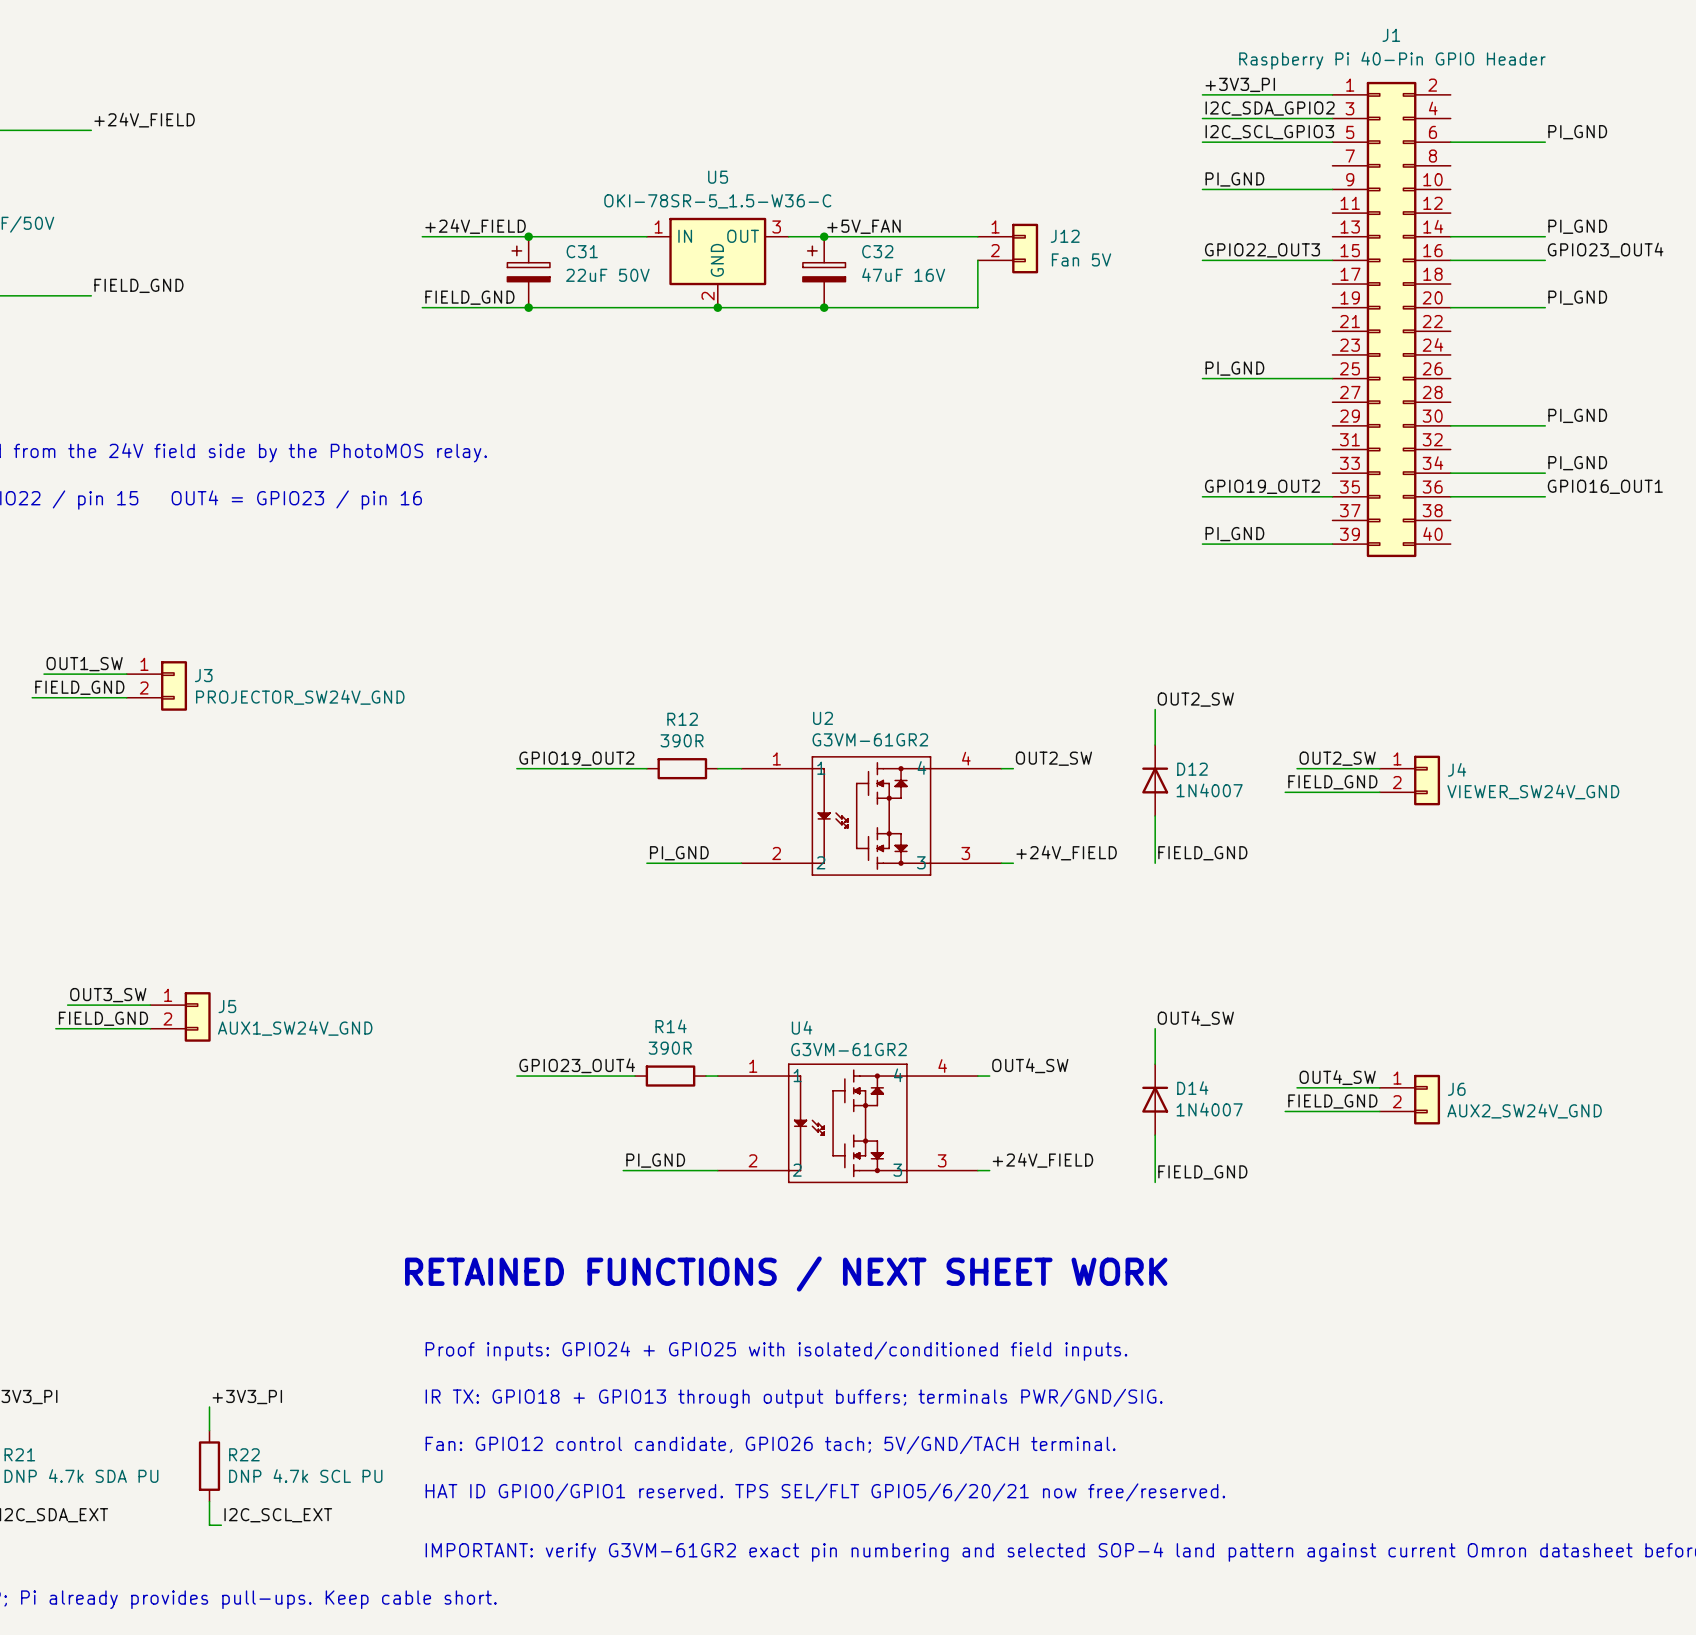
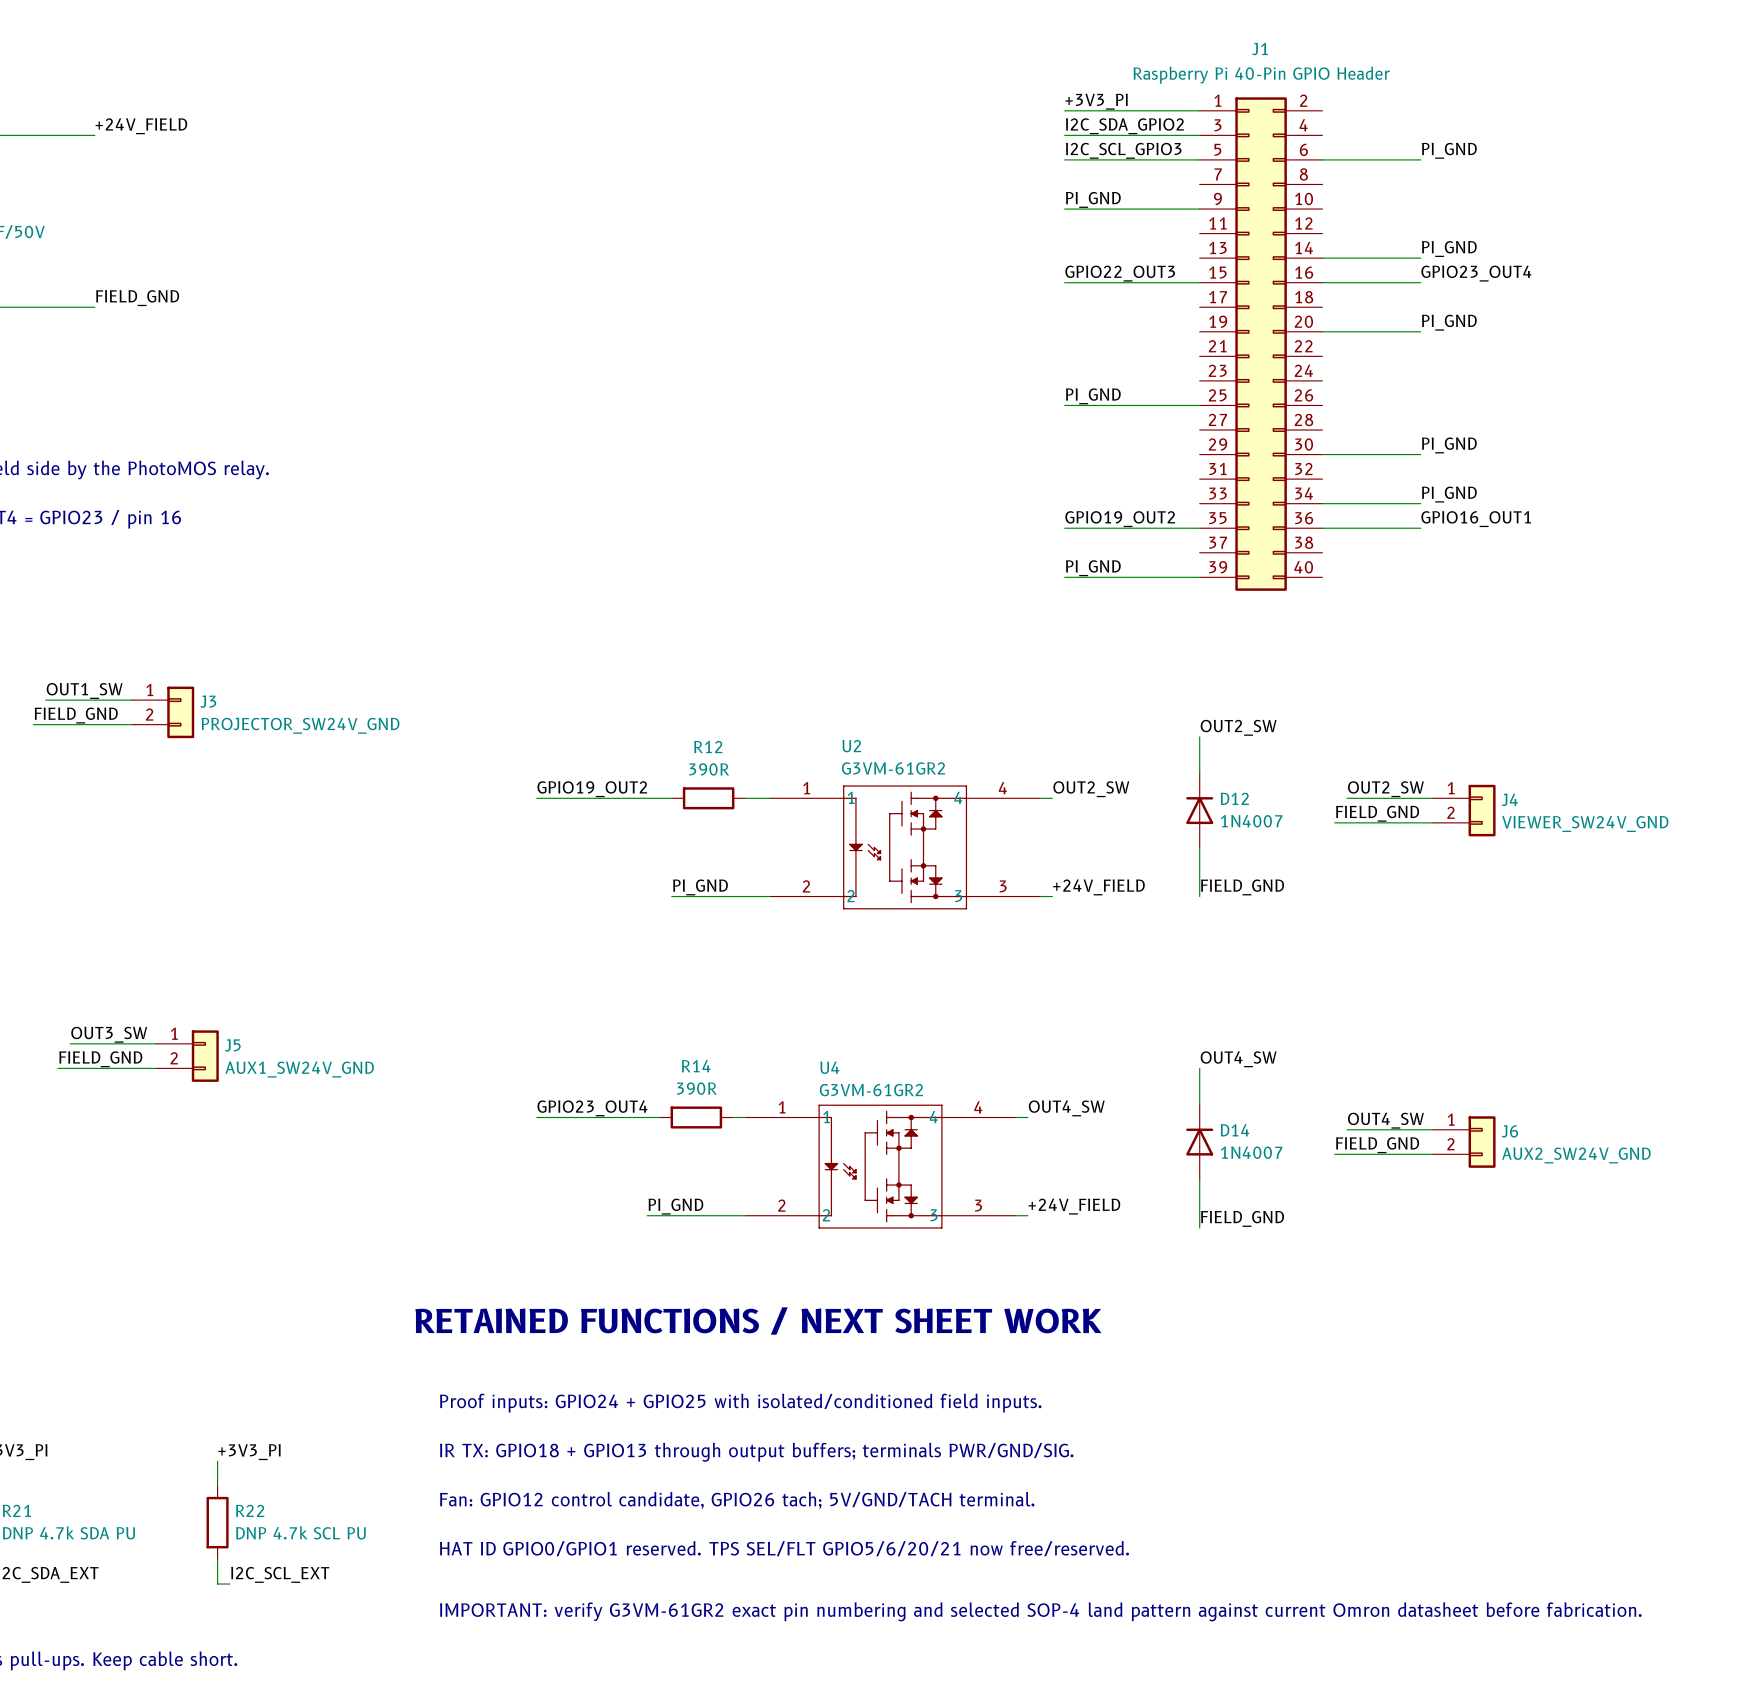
label position: +3V3_PI (1240, 84) -> +3V3_PI (1096, 101)
wire: (1202, 94) (1332, 94) -> (1064, 110) (1199, 110)
label position: I2C_SDA_GPIO2 (1270, 108) -> I2C_SDA_GPIO2 (1124, 126)
wire: (1202, 118) (1332, 118) -> (1064, 135) (1199, 135)
label position: I2C_SCL_GPIO3 (1269, 132) -> I2C_SCL_GPIO3 (1123, 150)
label: PI_GND (1577, 132) -> none
wire: (1202, 142) (1332, 142) -> (1064, 159) (1199, 159)
wire: (1450, 142) (1545, 142) -> (1322, 159) (1420, 159)
label: none -> PI_GND (1449, 150)
label: PI_GND (1234, 179) -> none
wire: (1202, 189) (1332, 189) -> (1064, 209) (1199, 209)
label: none -> PI_GND (1093, 199)
label: +24V_FIELD (475, 226) -> none
label: +5V_FAN (863, 226) -> none
label: PI_GND (1577, 226) -> none
wire: (422, 236) (646, 236) -> none
junction: (528, 236) -> none
wire: (788, 236) (977, 236) -> none
junction: (824, 236) -> none
wire: (1450, 236) (1545, 236) -> (1322, 258) (1420, 258)
label: none -> PI_GND (1449, 249)
J12: Fan 5V (1008, 248) -> none
label position: GPIO22_OUT3 (1262, 250) -> GPIO22_OUT3 (1120, 273)
label position: GPIO23_OUT4 (1605, 250) -> GPIO23_OUT4 (1476, 273)
wire: (977, 260) (977, 307) (422, 307) -> none
wire: (1202, 260) (1332, 260) -> (1064, 282) (1199, 282)
wire: (1450, 260) (1545, 260) -> (1322, 282) (1420, 282)
U5: OKI-78SR-5_1.5-W36-C (717, 262) -> none
C31: 22uF 50V (528, 272) -> none
C32: 47uF 16V (824, 272) -> none
label: FIELD_GND (469, 297) -> none
label: PI_GND (1577, 297) -> none
junction: (528, 307) -> none
junction: (717, 307) -> none
junction: (824, 307) -> none
wire: (1450, 307) (1545, 307) -> (1322, 331) (1420, 331)
label: none -> PI_GND (1449, 322)
J1 position: (1391, 319) -> (1261, 344)
label: PI_GND (1234, 368) -> none
wire: (1202, 378) (1332, 378) -> (1064, 405) (1199, 405)
label: none -> PI_GND (1093, 396)
label: PI_GND (1577, 415) -> none
wire: (1450, 425) (1545, 425) -> (1322, 454) (1420, 454)
label: none -> PI_GND (1449, 445)
label: PI_GND (1577, 463) -> none
wire: (1450, 473) (1545, 473) -> (1322, 503) (1420, 503)
label: none -> PI_GND (1449, 494)
label position: GPIO19_OUT2 (1262, 486) -> GPIO19_OUT2 (1120, 519)
label position: GPIO16_OUT1 (1605, 486) -> GPIO16_OUT1 (1476, 519)
wire: (1202, 496) (1332, 496) -> (1064, 528) (1199, 528)
wire: (1450, 496) (1545, 496) -> (1322, 528) (1420, 528)
label: PI_GND (1234, 534) -> none
wire: (1202, 544) (1332, 544) -> (1064, 577) (1199, 577)
label: none -> PI_GND (1093, 568)

